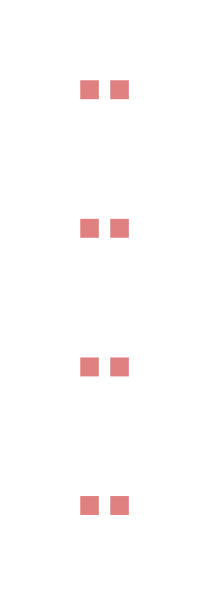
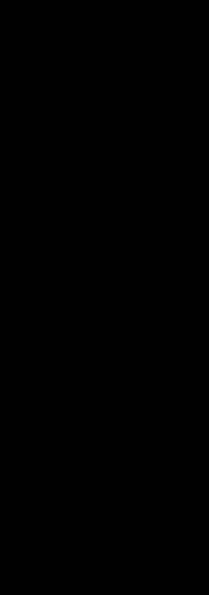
part: (104, 89) -> none
part: (104, 228) -> none
part: (104, 366) -> none
part: (104, 505) -> none

